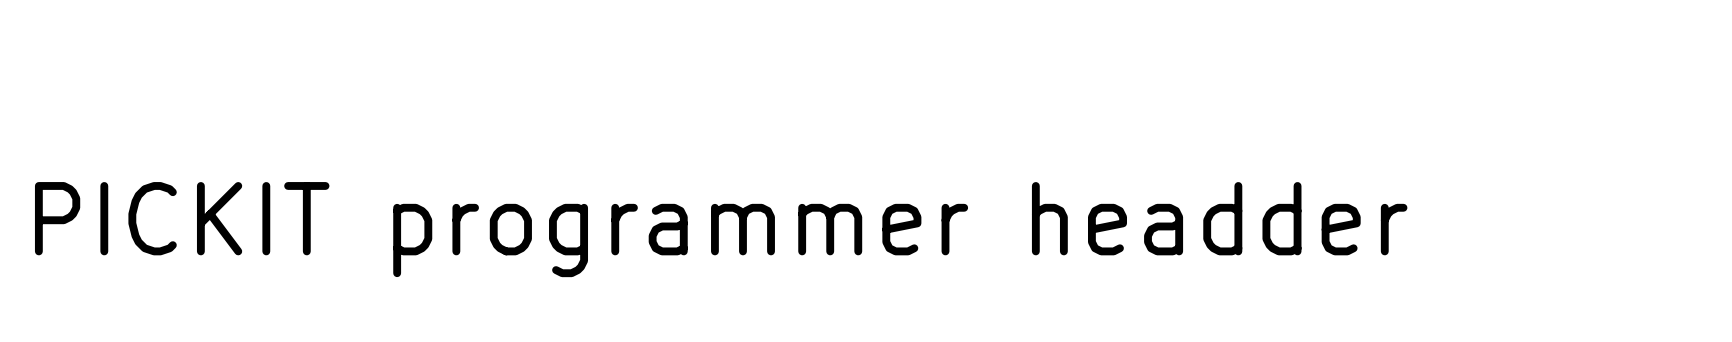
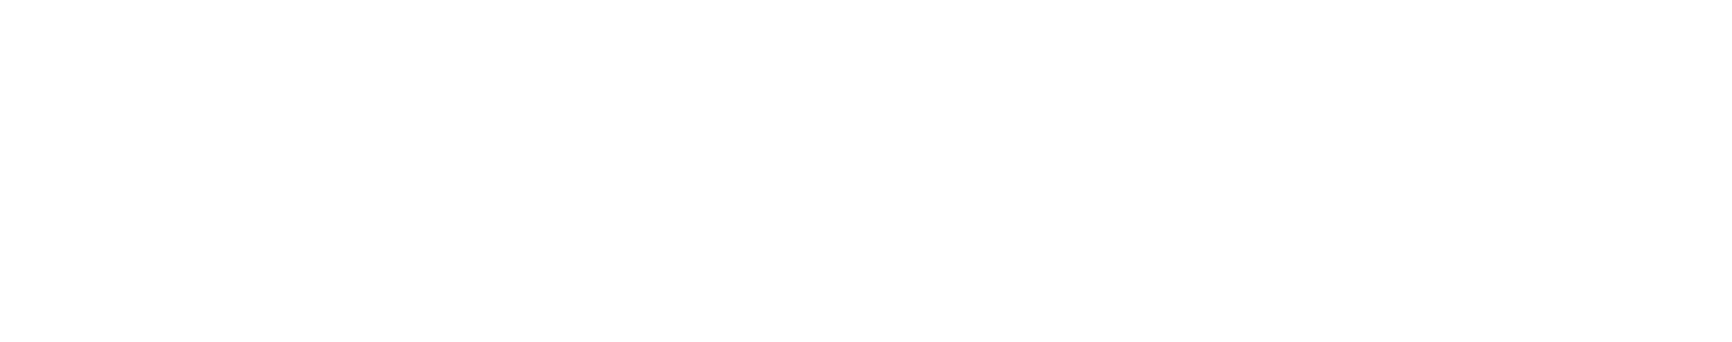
text: PICKIT programmer headder (721, 229) -> none

